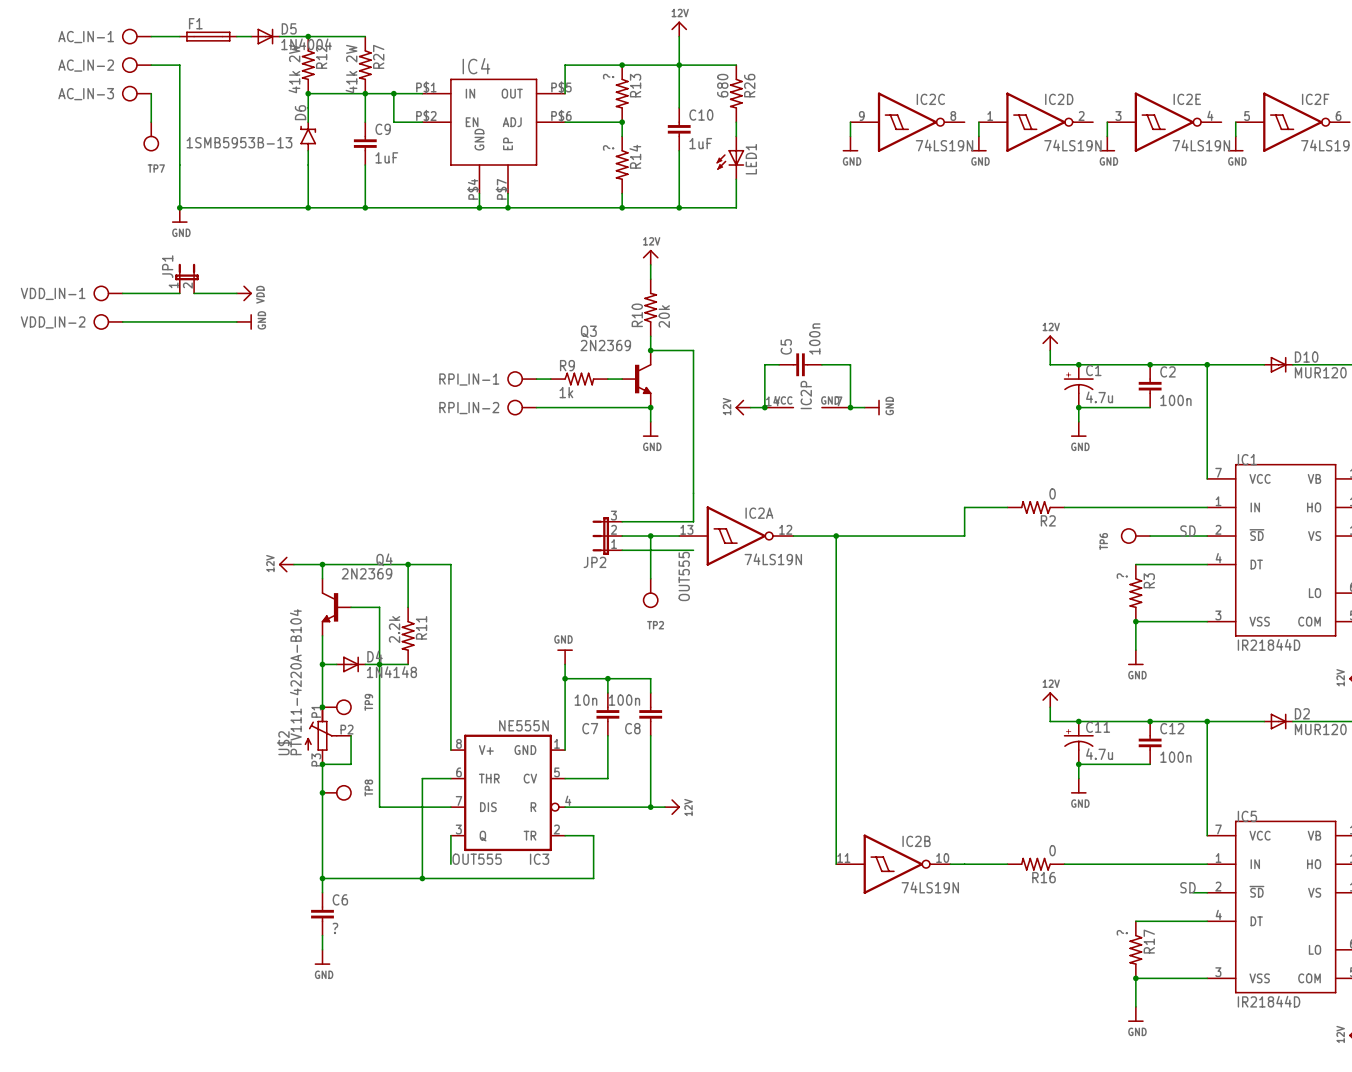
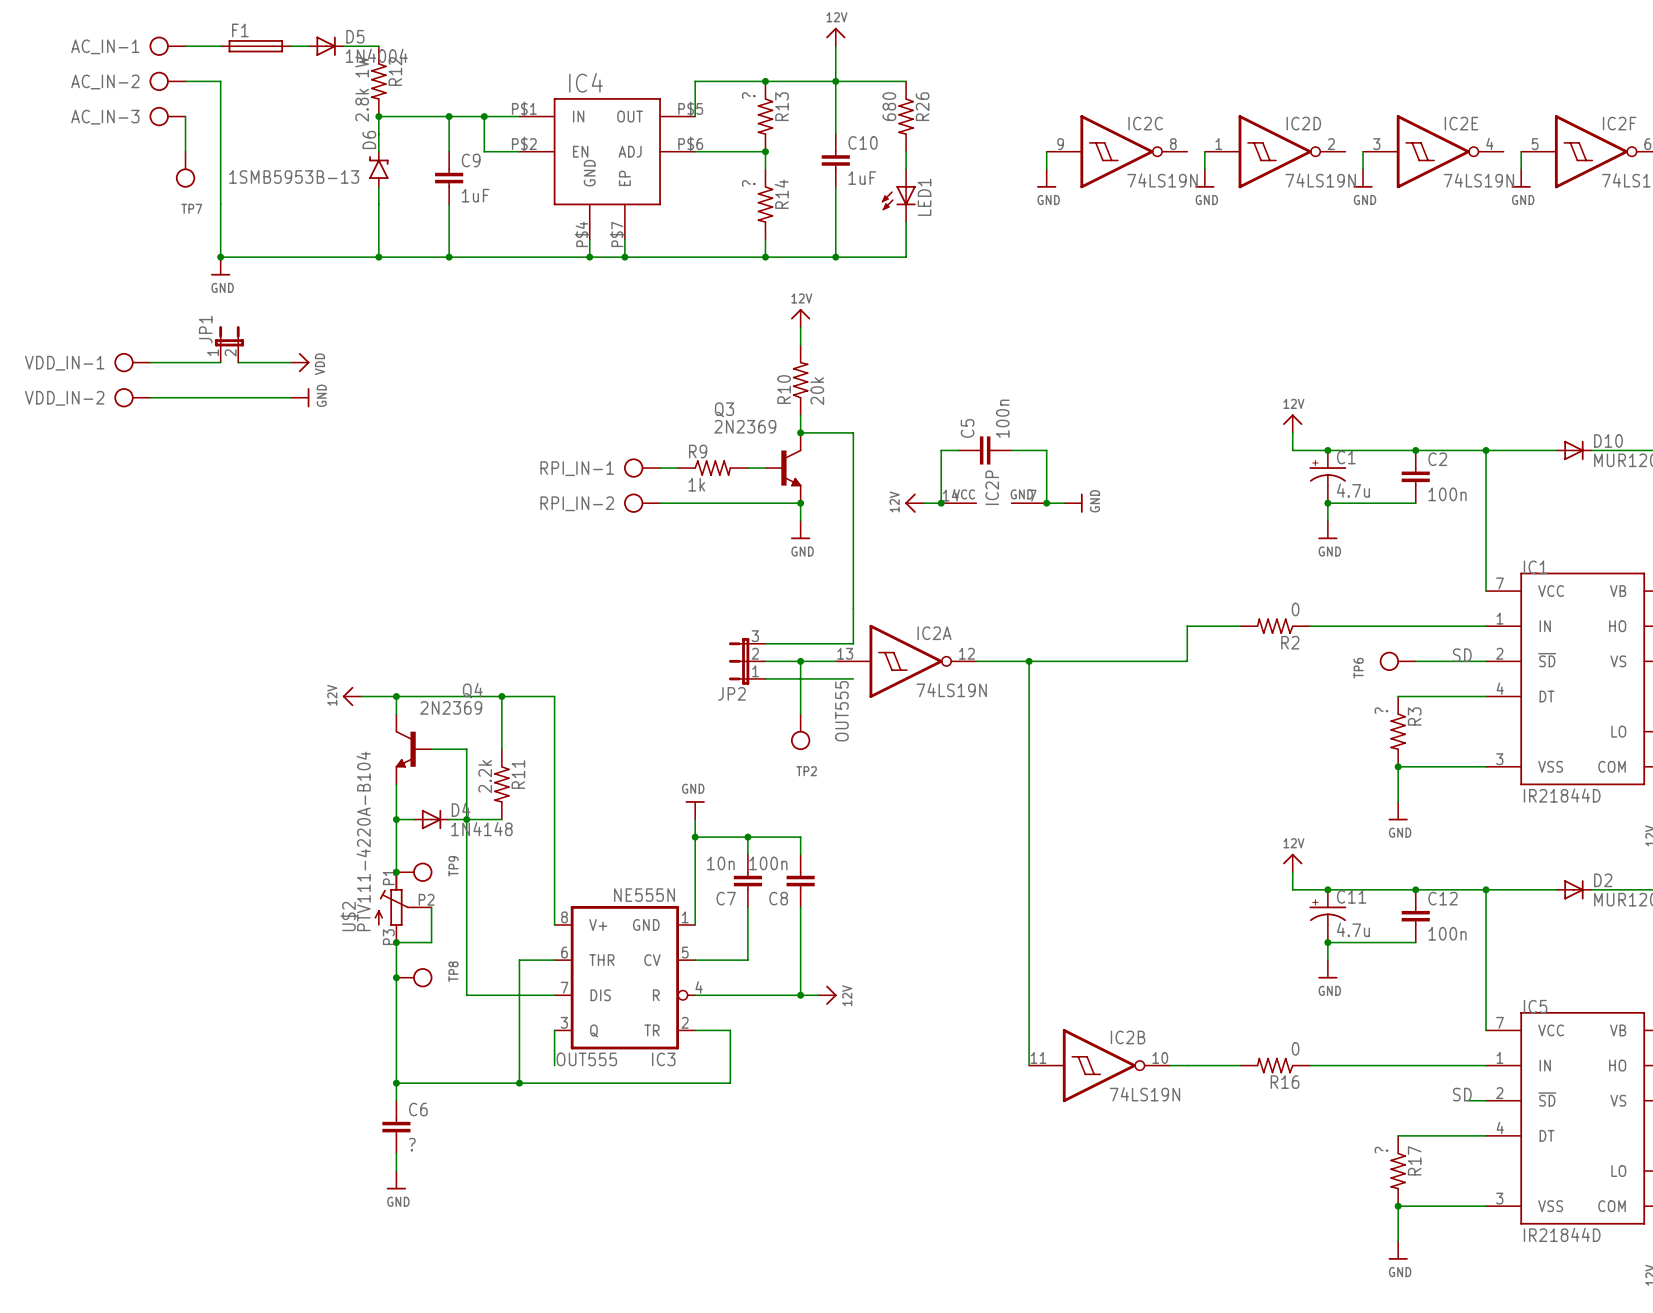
wire: (308, 36) (365, 36) -> none
junction: (308, 36) -> none
R27: 41k 2W (365, 65) -> none
R12 value: 41k 2W (294, 69) -> 2.8k 1W (362, 89)

